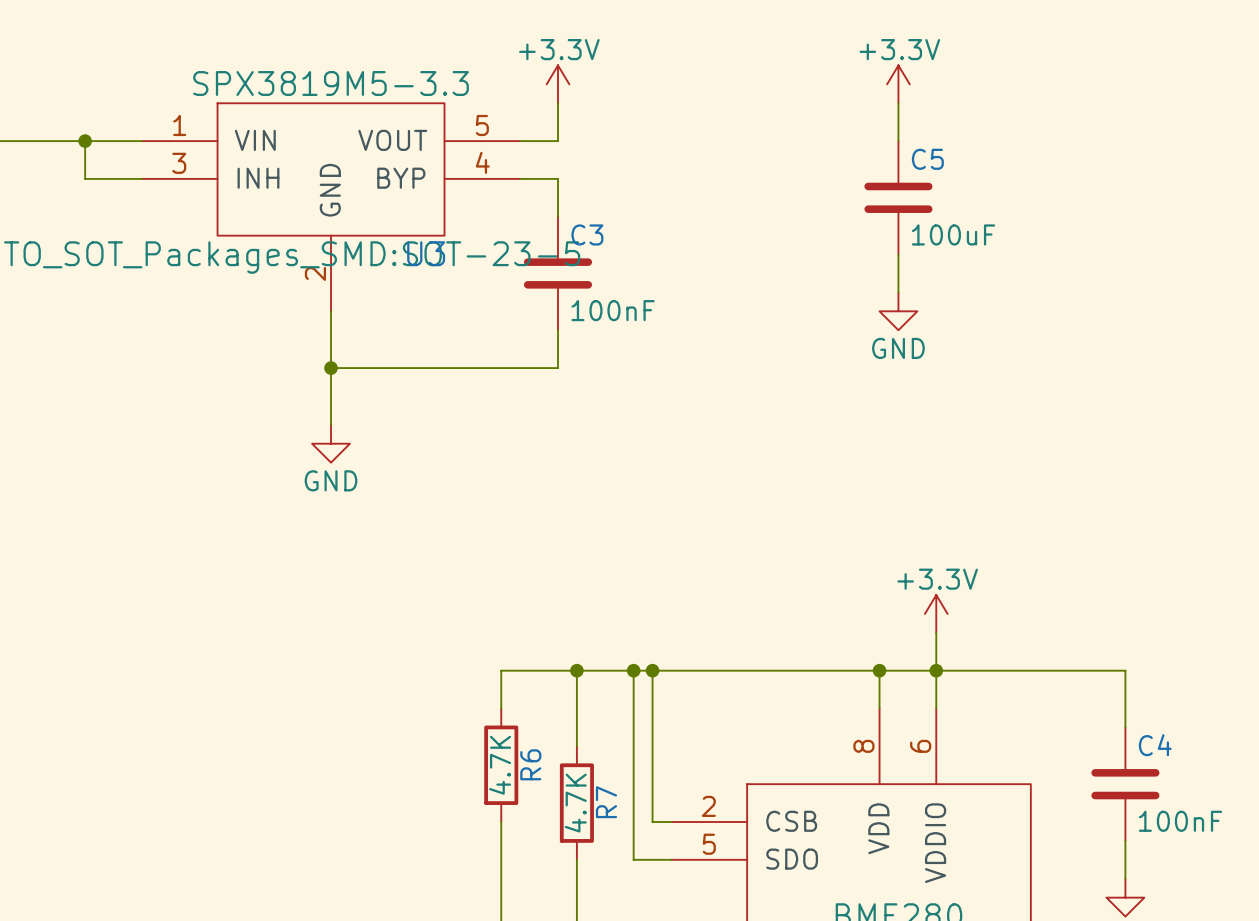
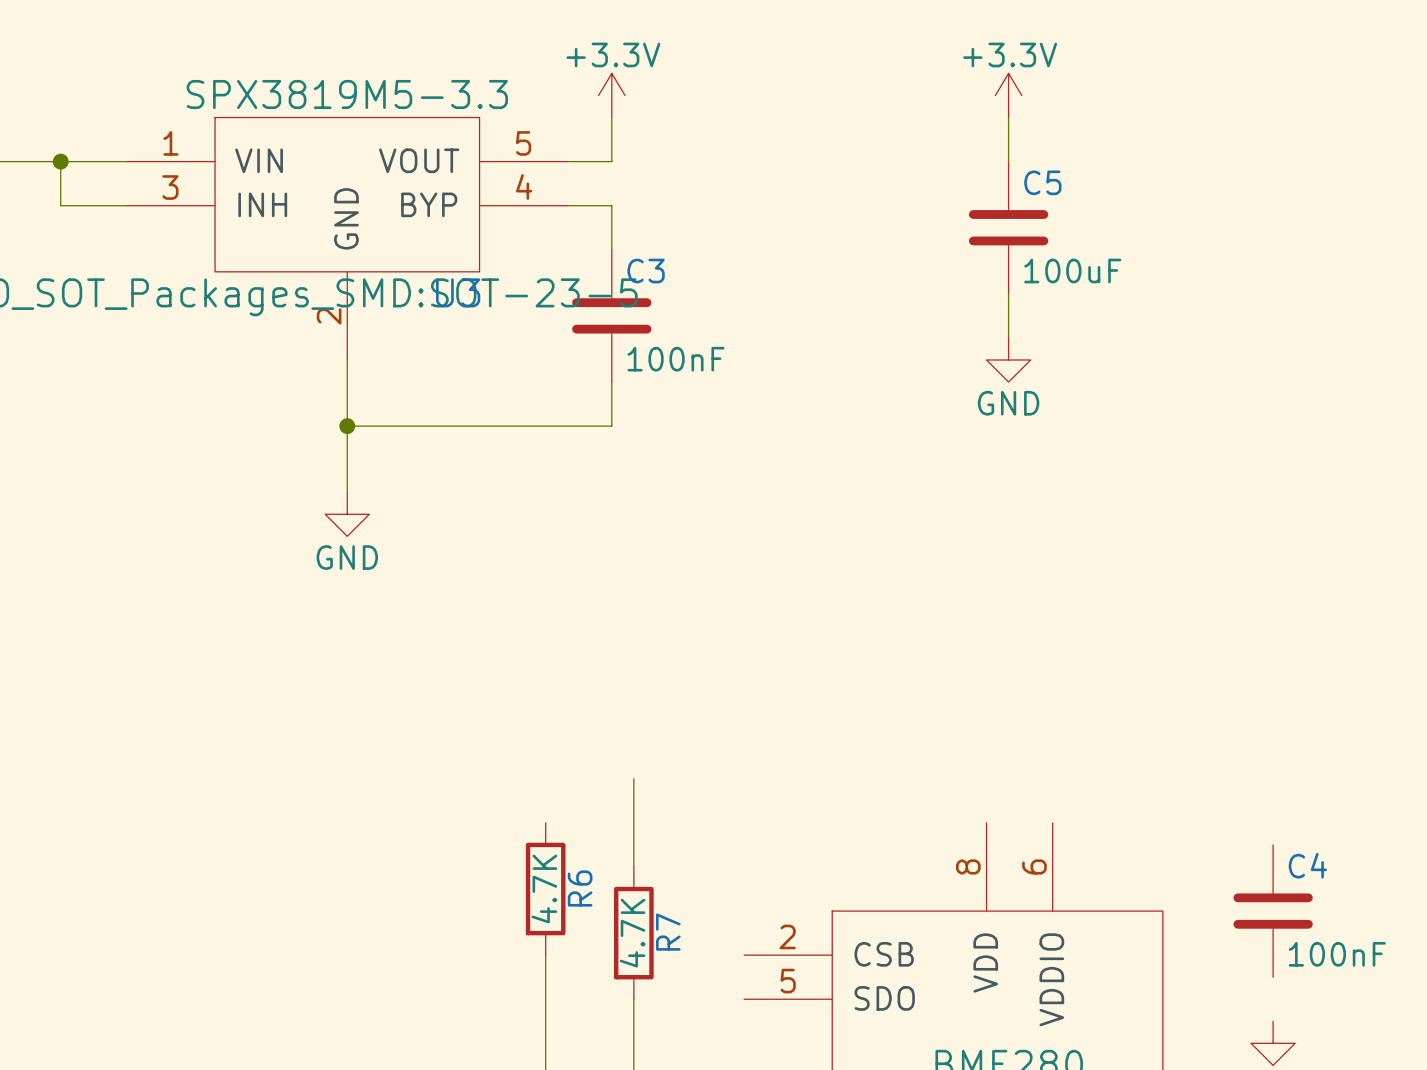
power symbol: +3.3V (936, 613) -> none
wire: (936, 632) (936, 708) -> none
junction: (576, 670) -> none
wire: (633, 670) (633, 859) (671, 859) -> none
junction: (633, 670) -> none
wire: (652, 670) (652, 822) (671, 822) -> none
junction: (652, 670) -> none
wire: (879, 670) (879, 708) -> none
junction: (879, 670) -> none
junction: (936, 670) -> none
wire: (501, 708) (501, 670) (1125, 670) (1125, 727) -> none
wire: (1125, 840) (1125, 878) -> none

